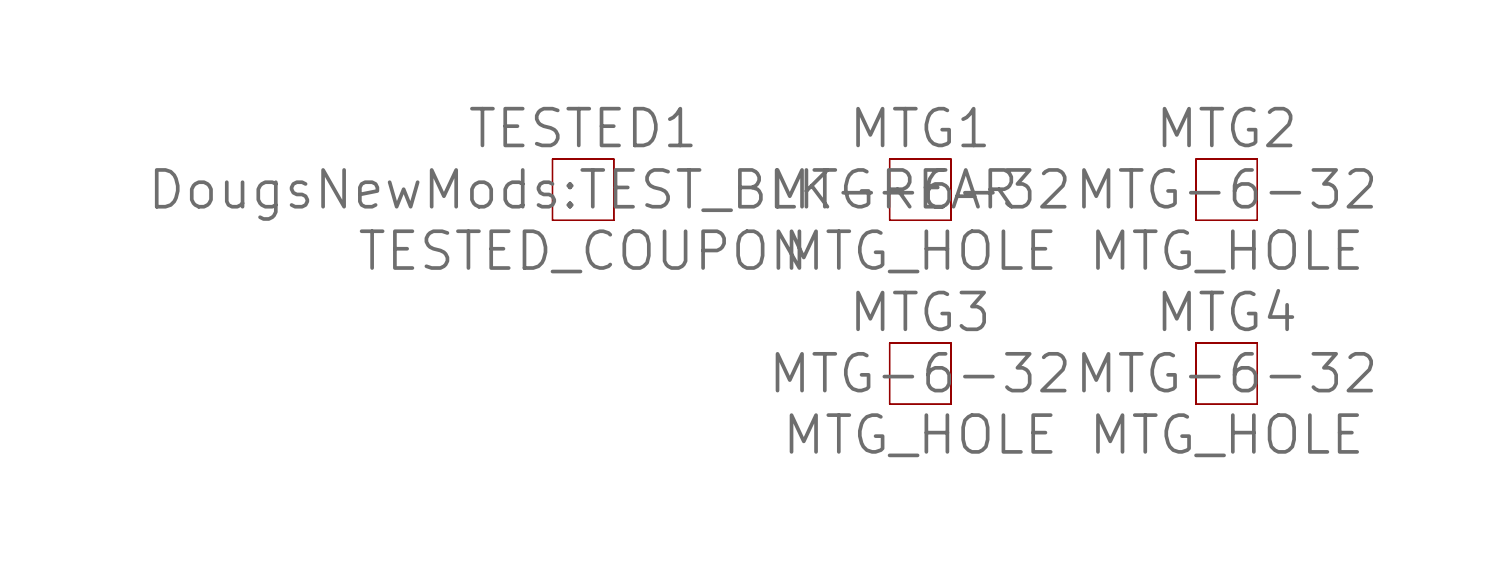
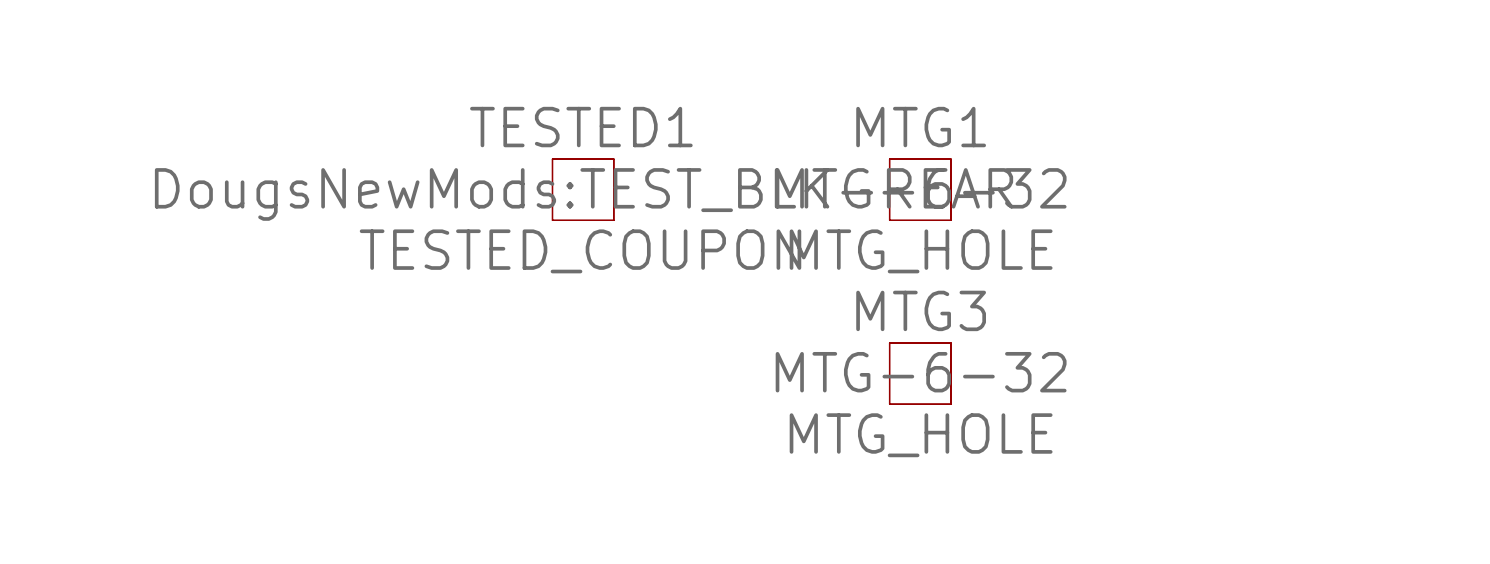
MTG2: MTG_HOLE (1226, 189) -> none
MTG4: MTG_HOLE (1226, 373) -> none

